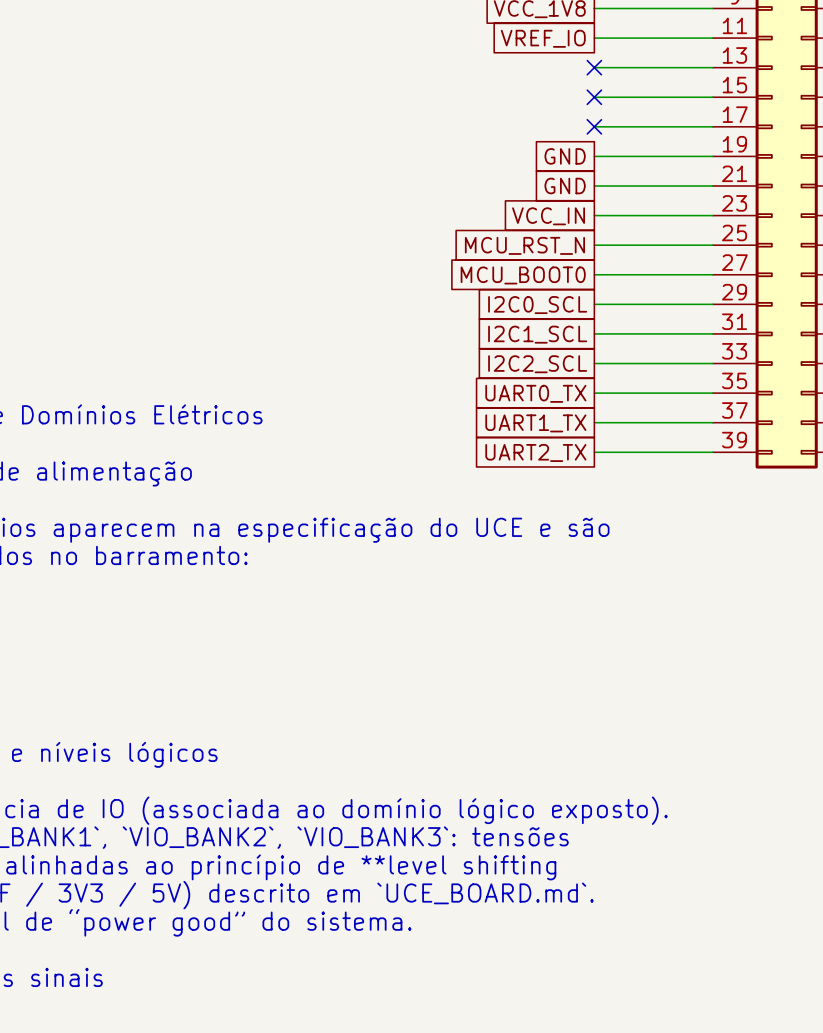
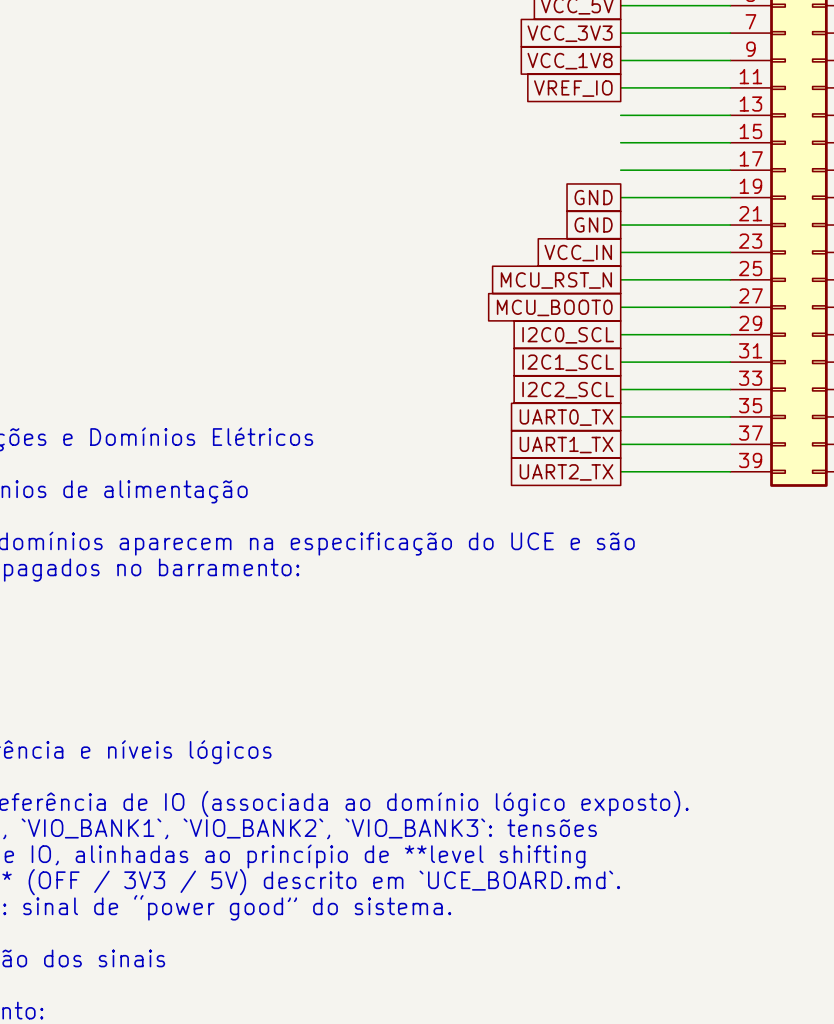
no-connect mark: (594, 67) -> none
no-connect mark: (594, 97) -> none
no-connect mark: (594, 126) -> none

